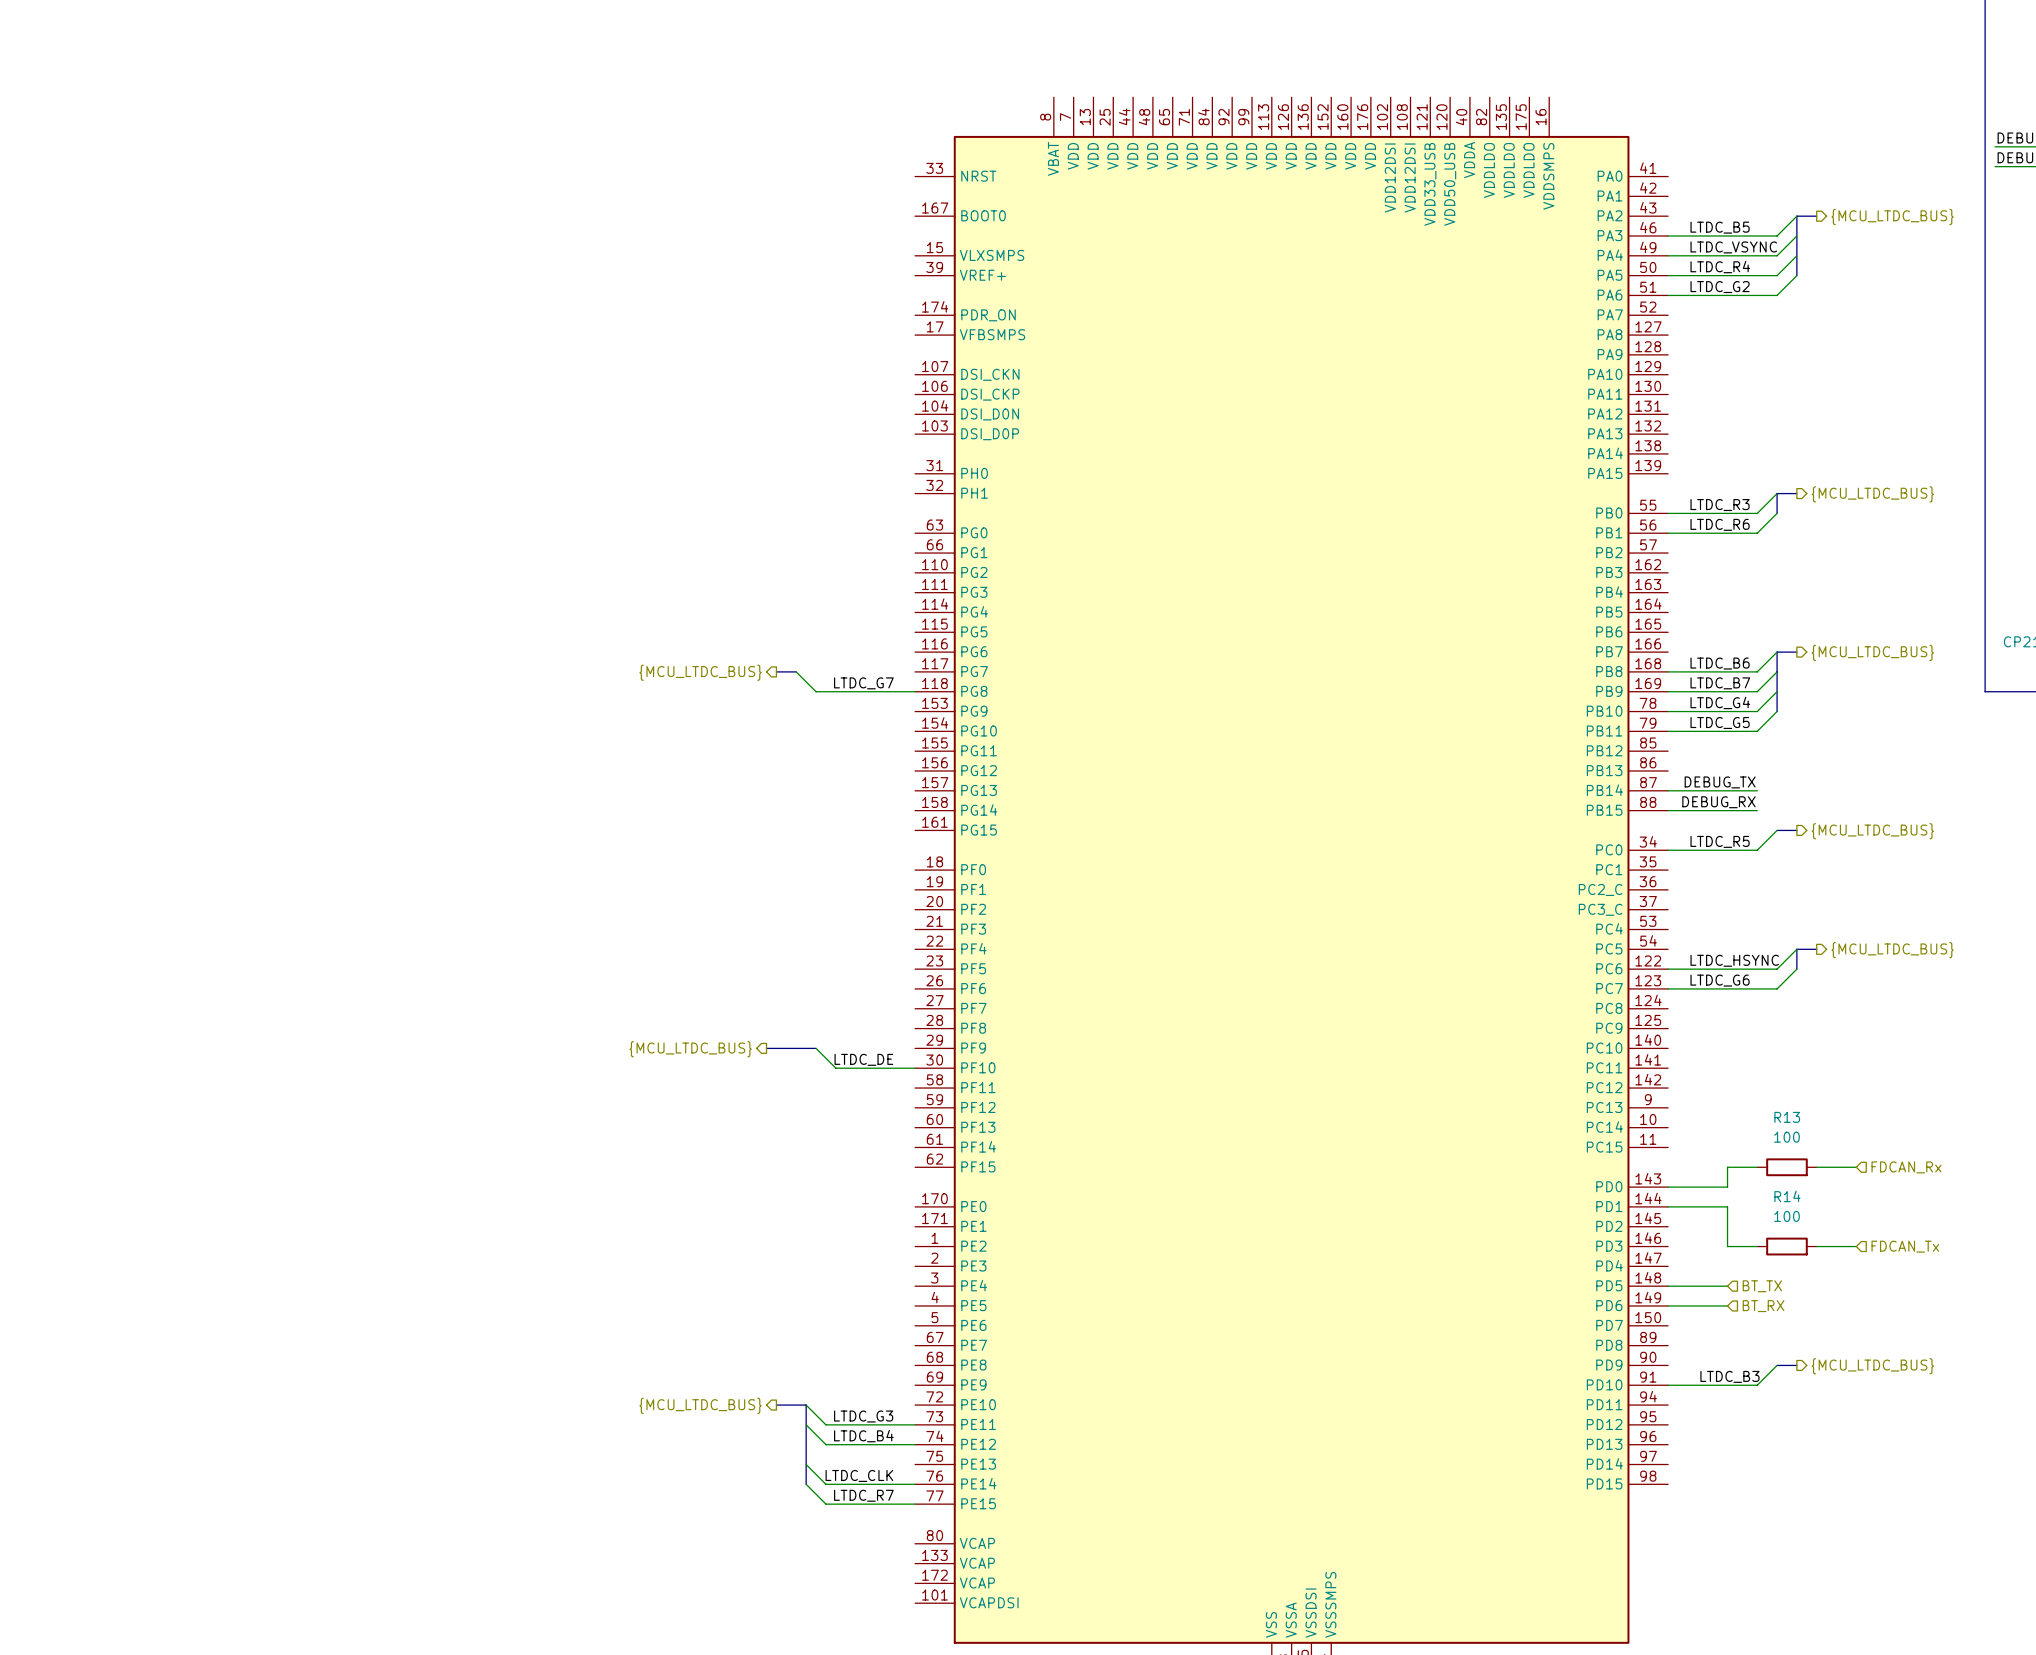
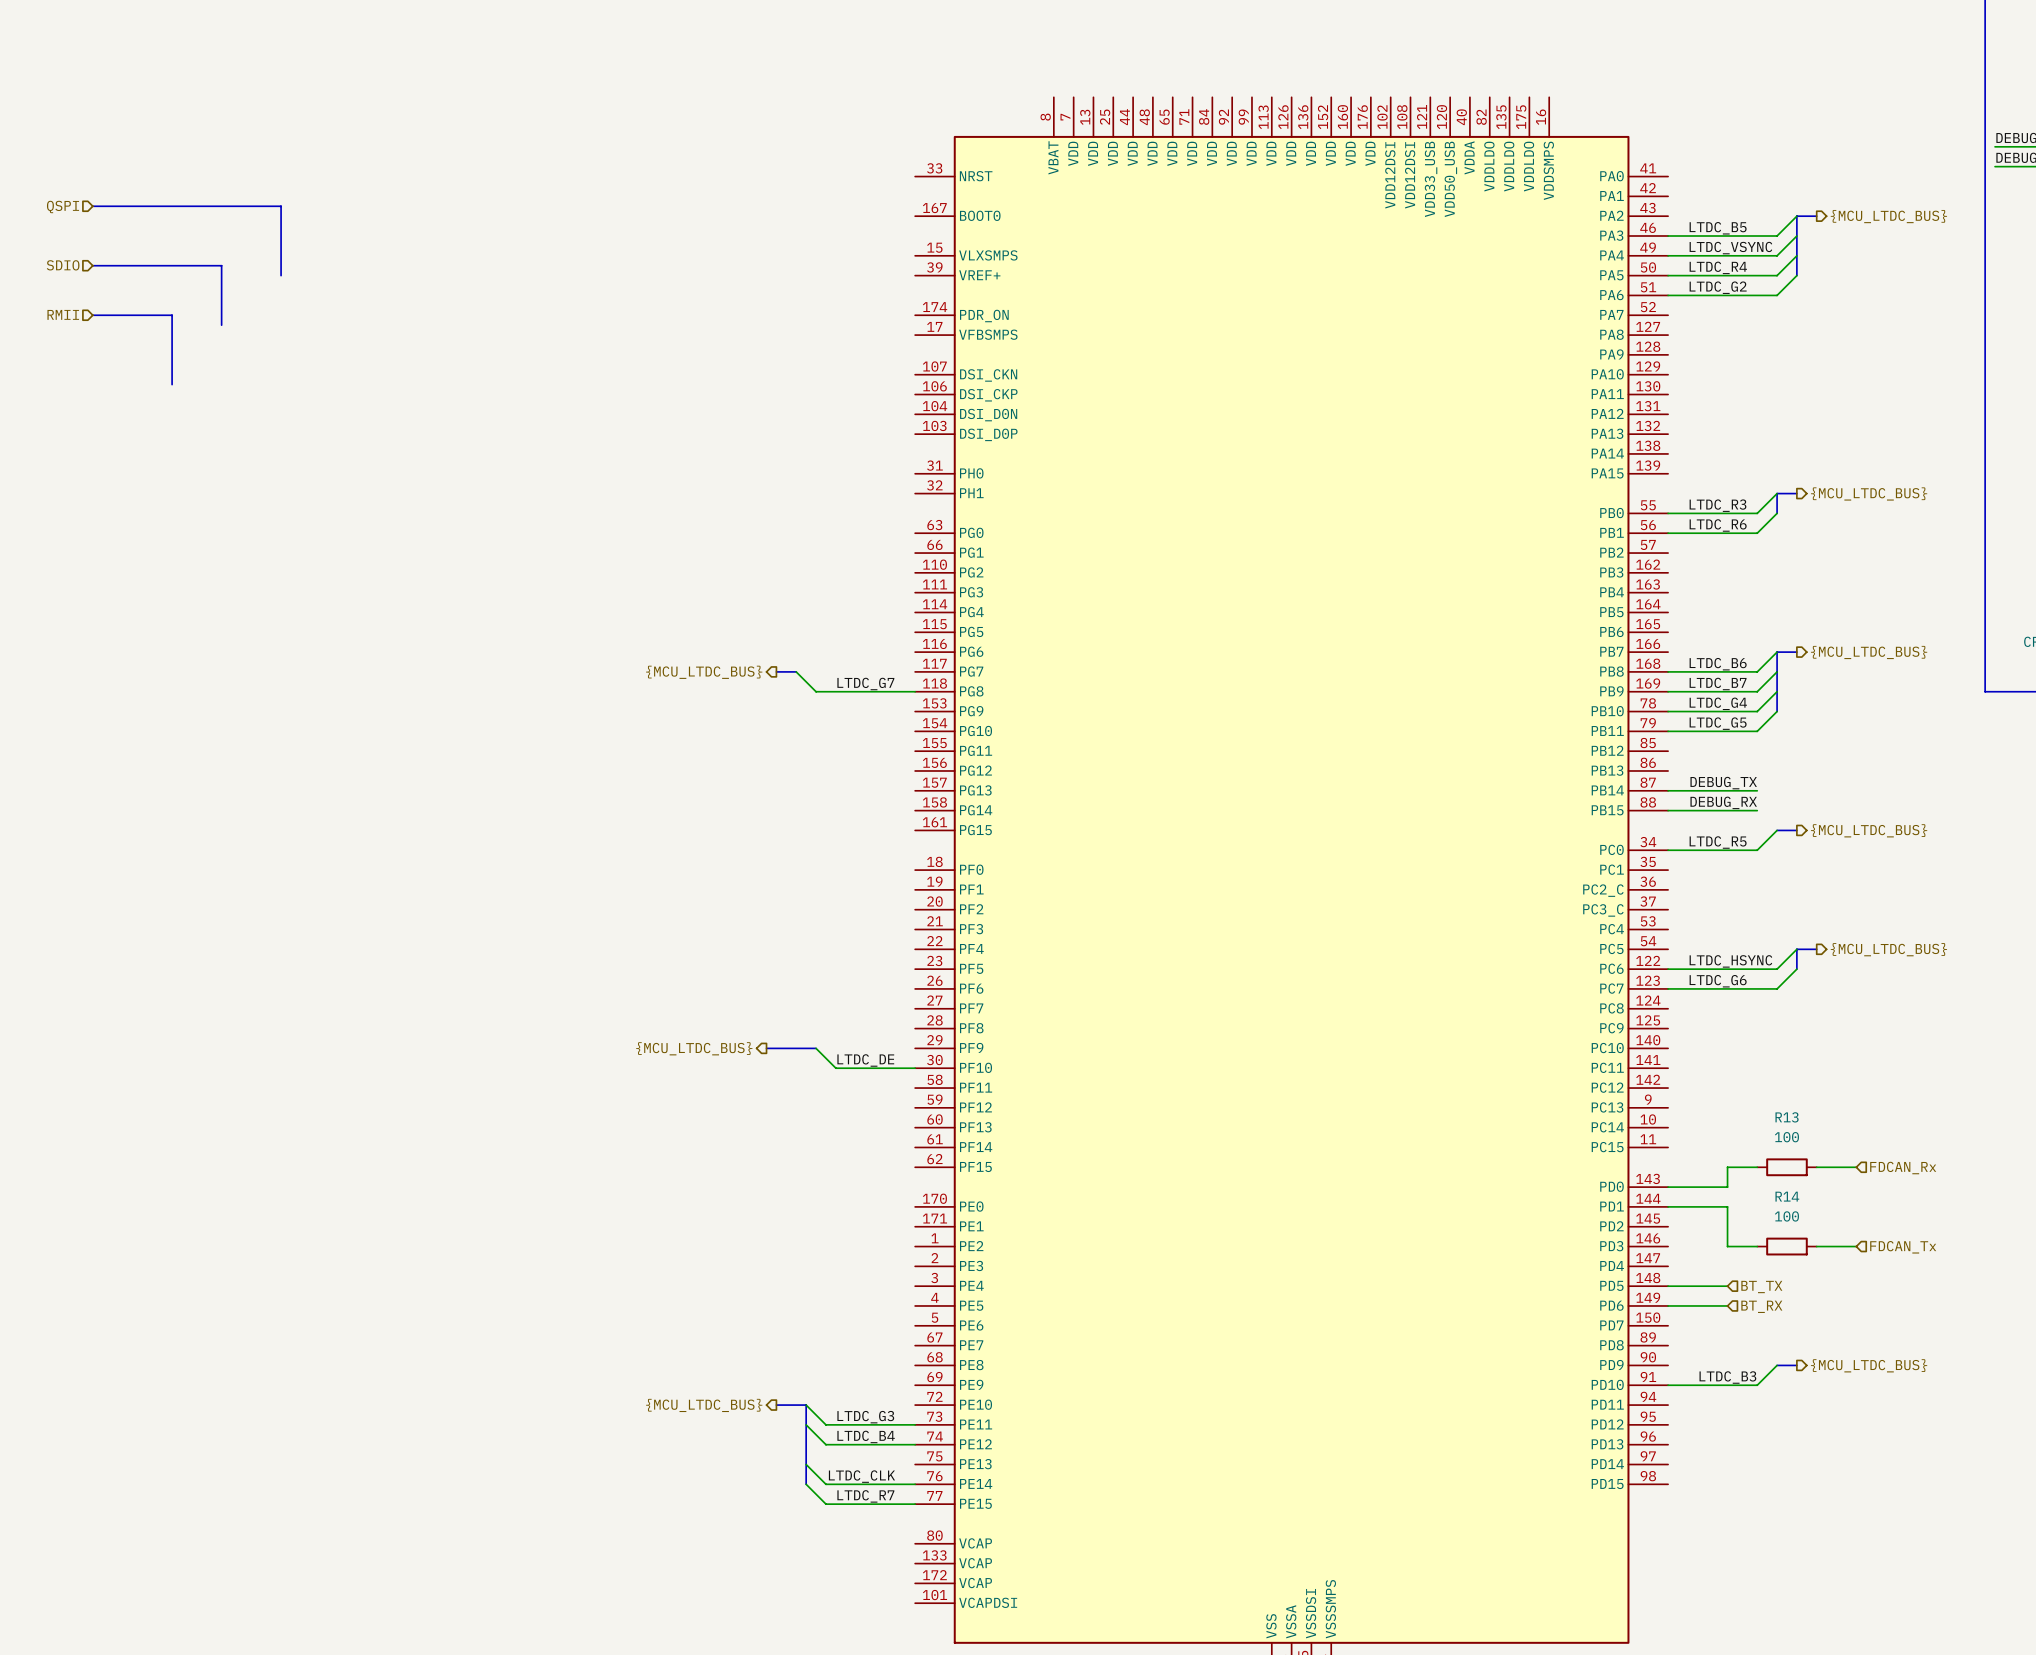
hierarchical label: none -> QSPI (63, 206)
bus: none -> (92, 206) (281, 206) (281, 275)
hierarchical label: none -> SDIO (63, 265)
bus: none -> (92, 265) (221, 265) (221, 325)
hierarchical label: none -> RMII (63, 314)
bus: none -> (92, 315) (172, 315) (172, 384)

